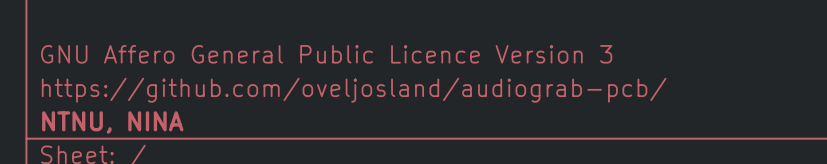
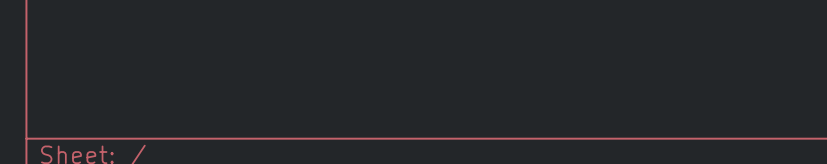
title block: GNU Affero General Public Licence Version 3 (326, 54) -> none
title block: https://github.com/oveljosland/audiograb-pcb/ (354, 90) -> none
title block: NTNU, NINA (112, 122) -> none

